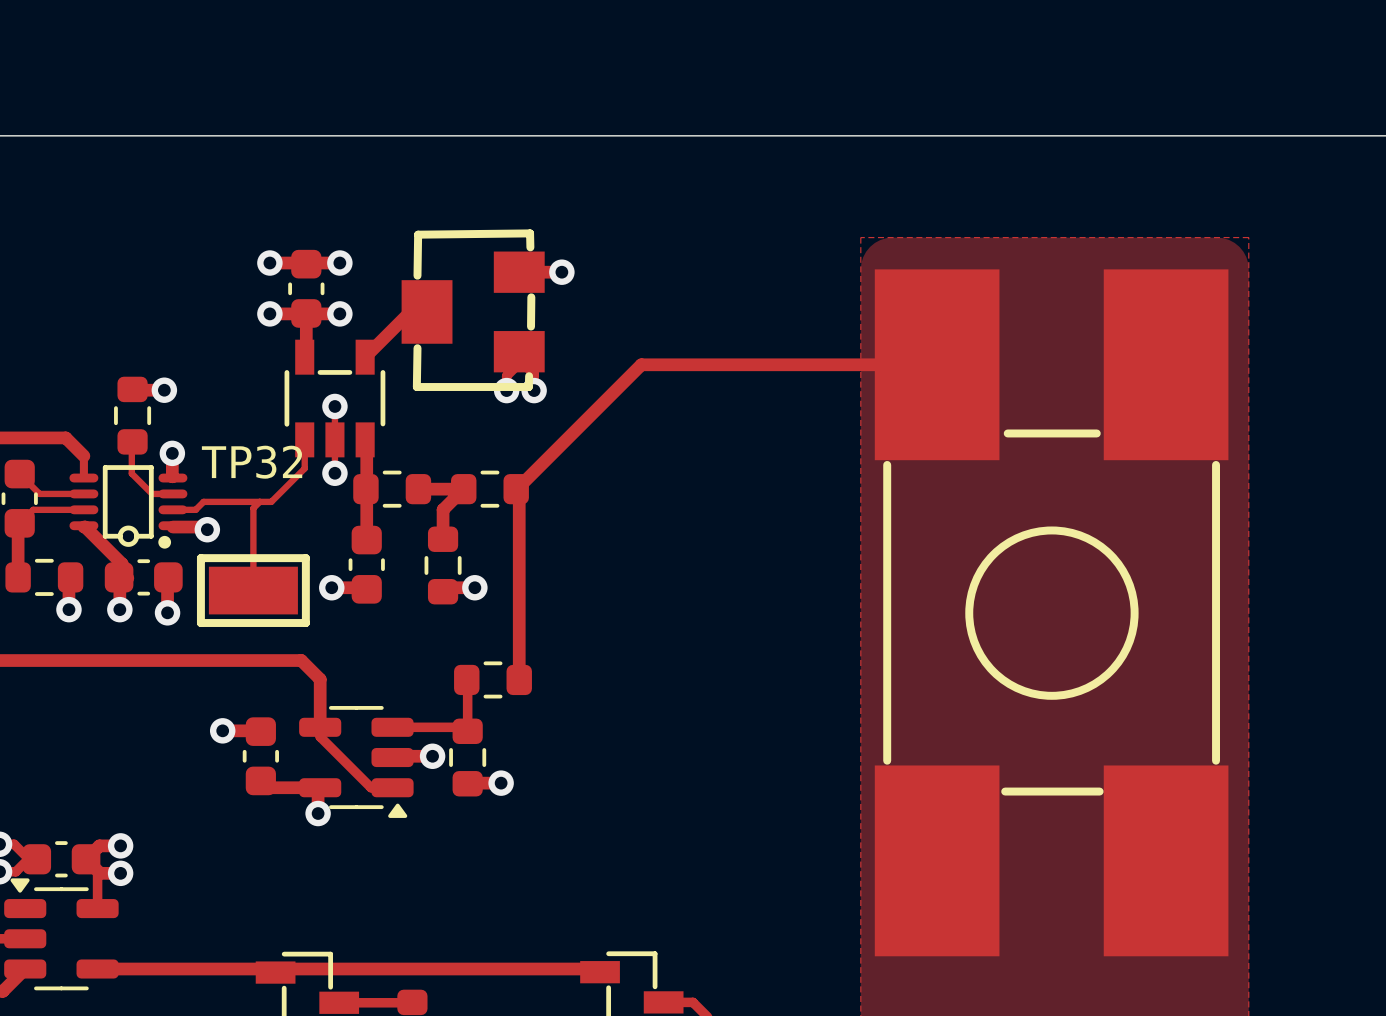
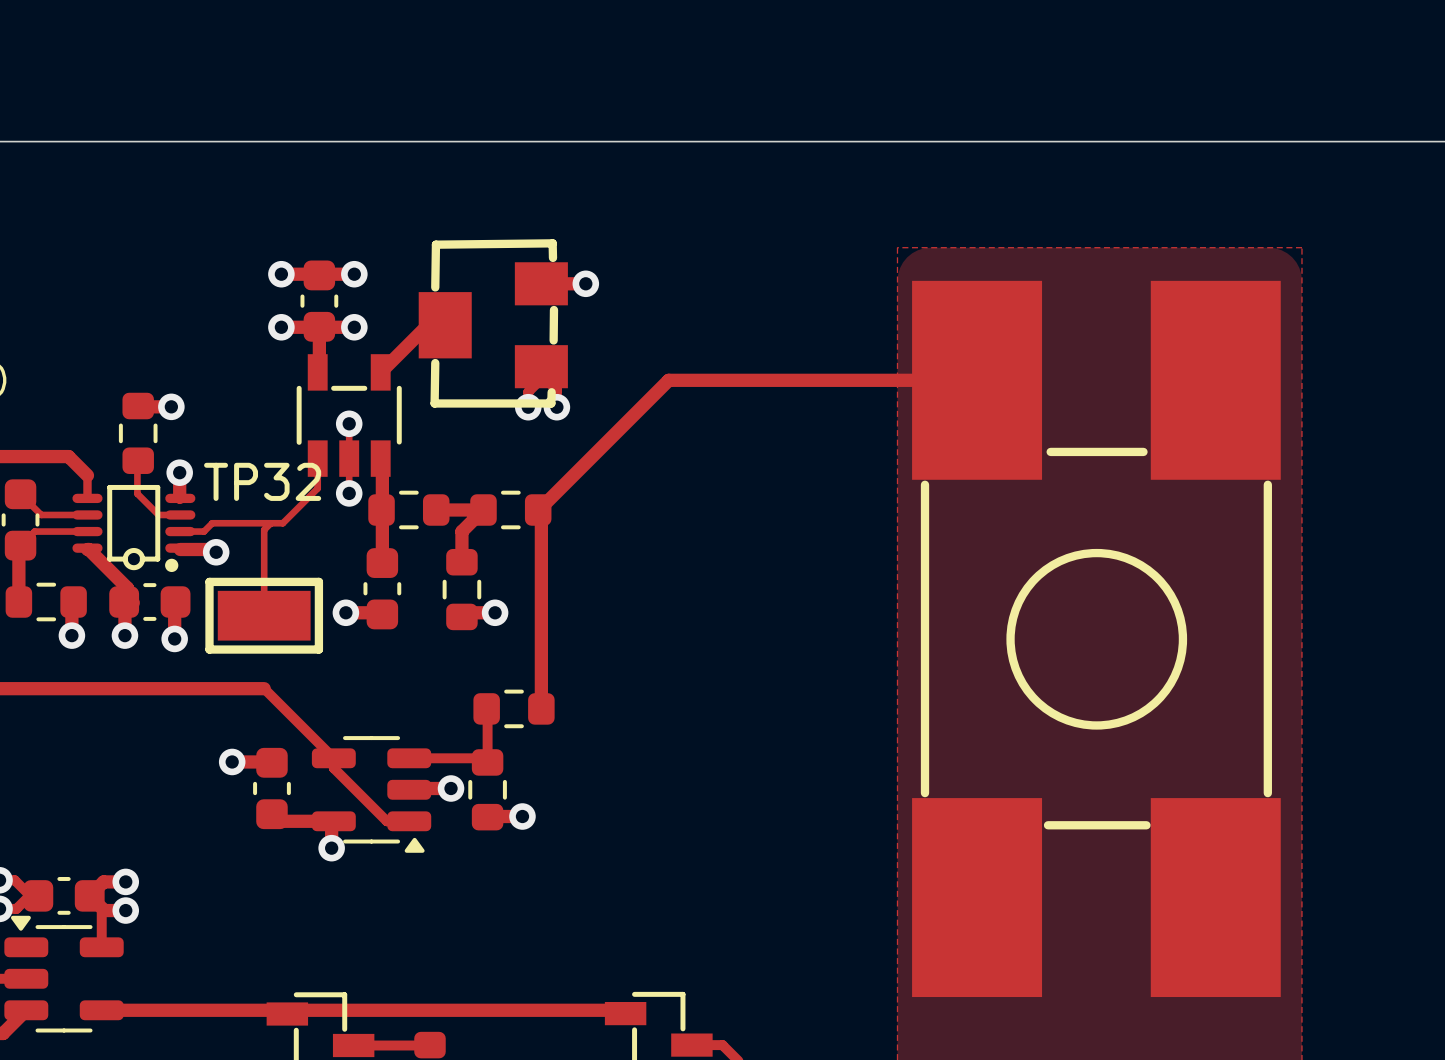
track: (253, 660) (301, 660) (320, 679) (320, 727) -> (264, 688) (333, 758)

